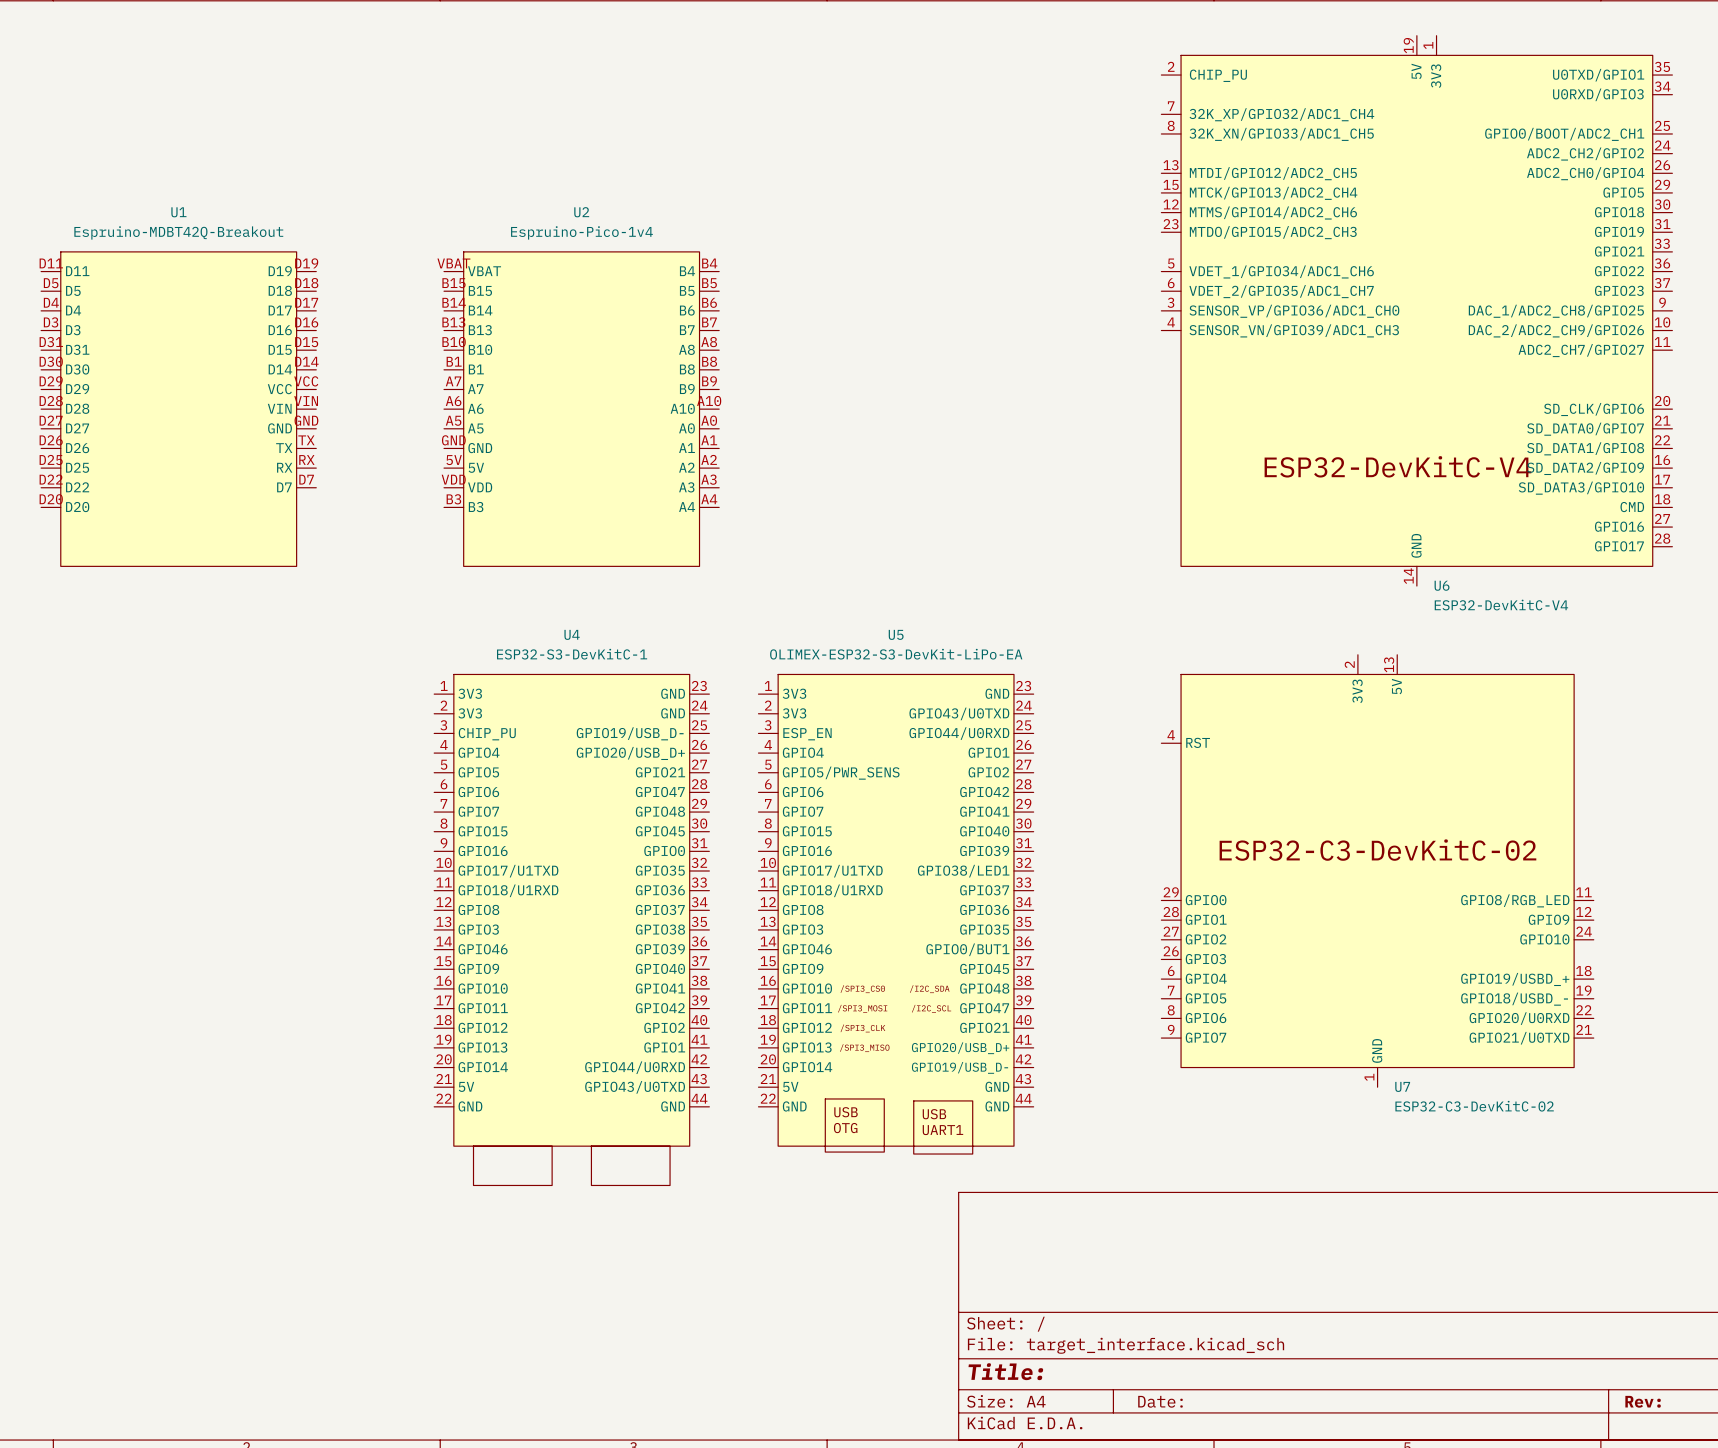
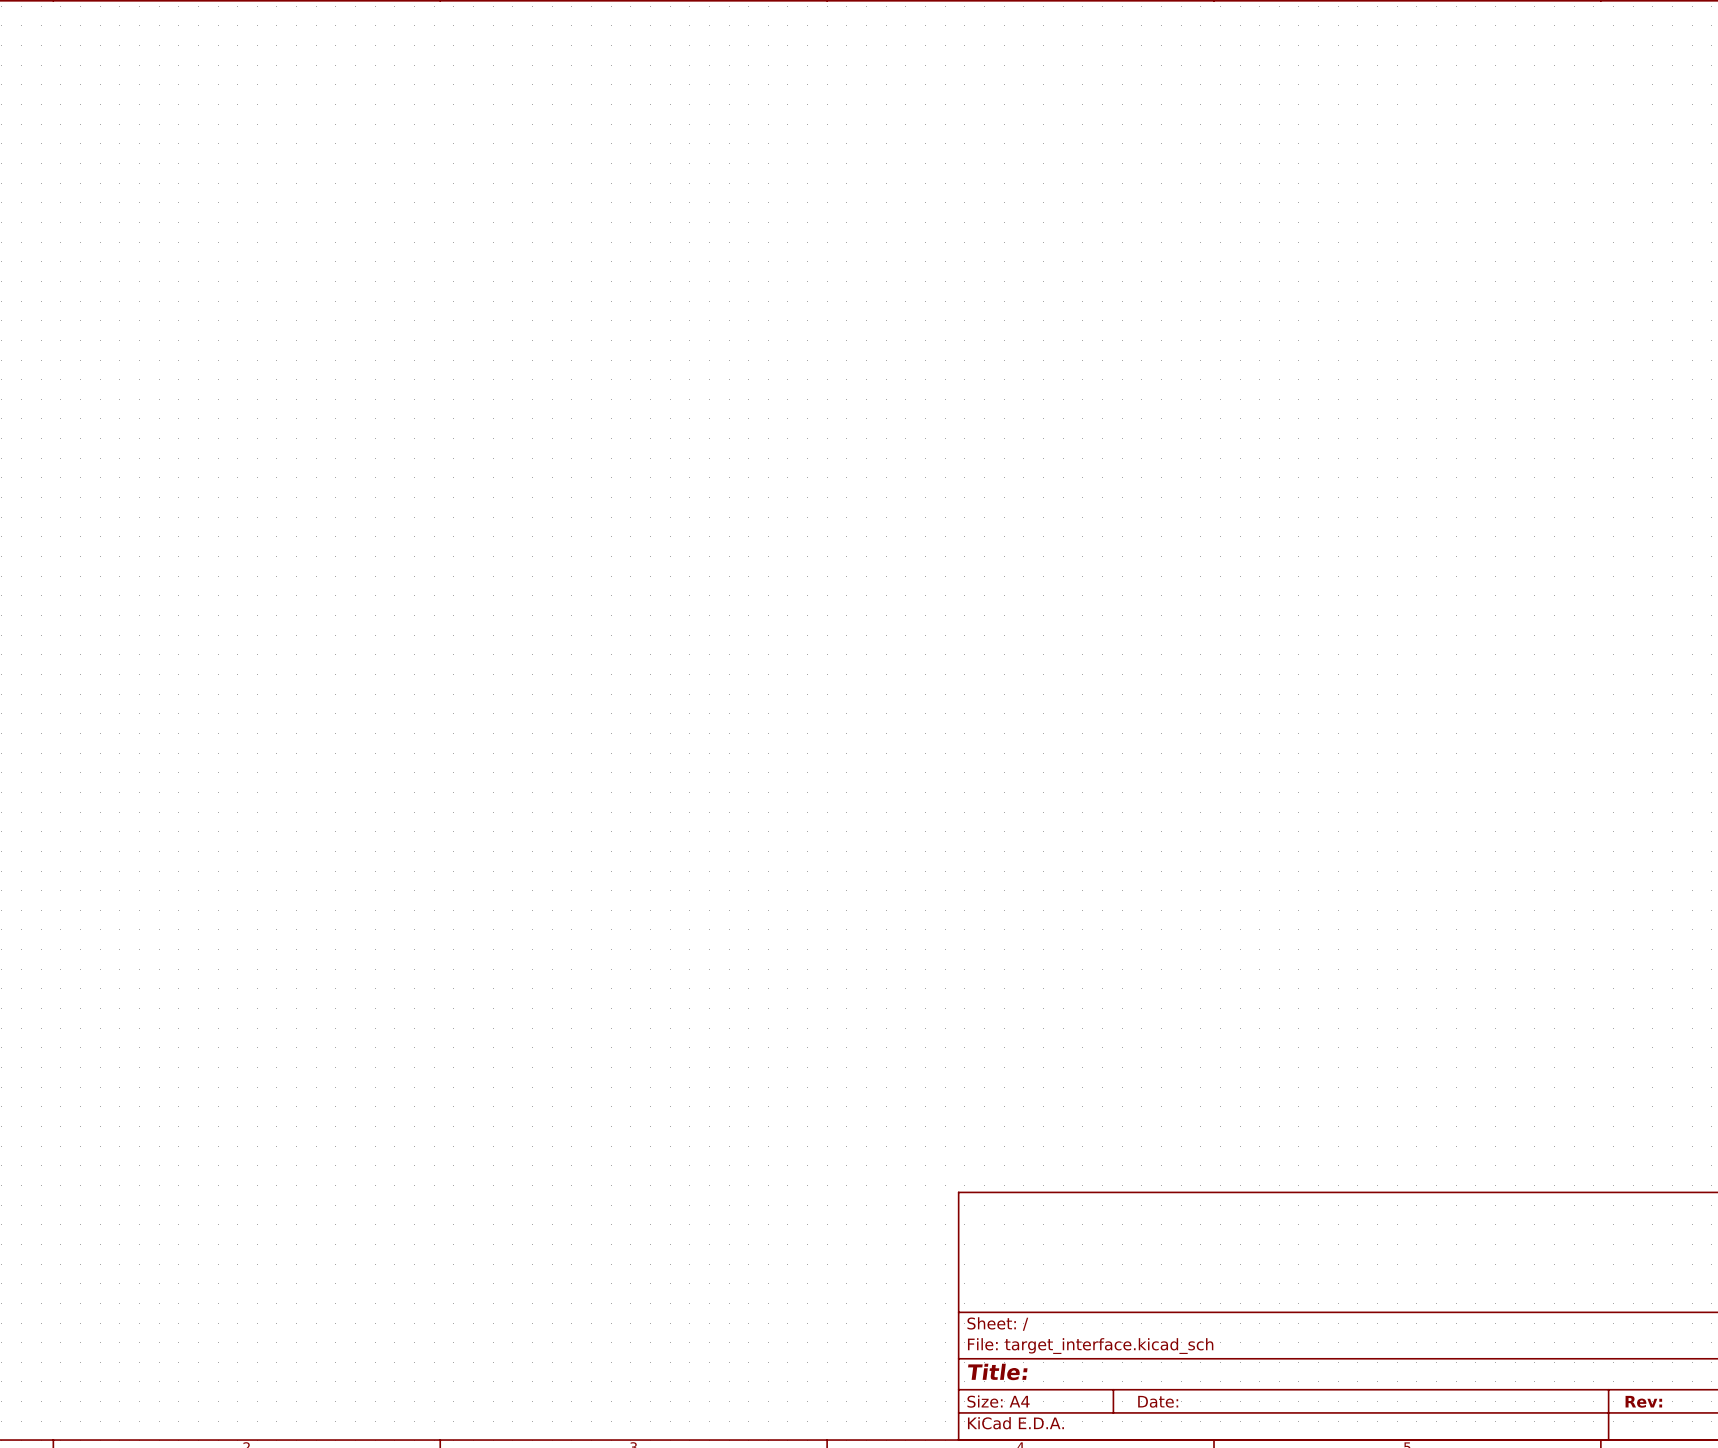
U6: ESP32-DevKitC-V4 (1416, 310) -> none
U1: Espruino-MDBT42Q-Breakout (178, 409) -> none
U2: Espruino-Pico-1v4 (581, 409) -> none
U7: ESP32-C3-DevKitC-02 (1377, 871) -> none
U5: OLIMEX-ESP32-S3-DevKit-LiPo-EA (896, 914) -> none
U4: ESP32-S3-DevKitC-1 (571, 929) -> none

